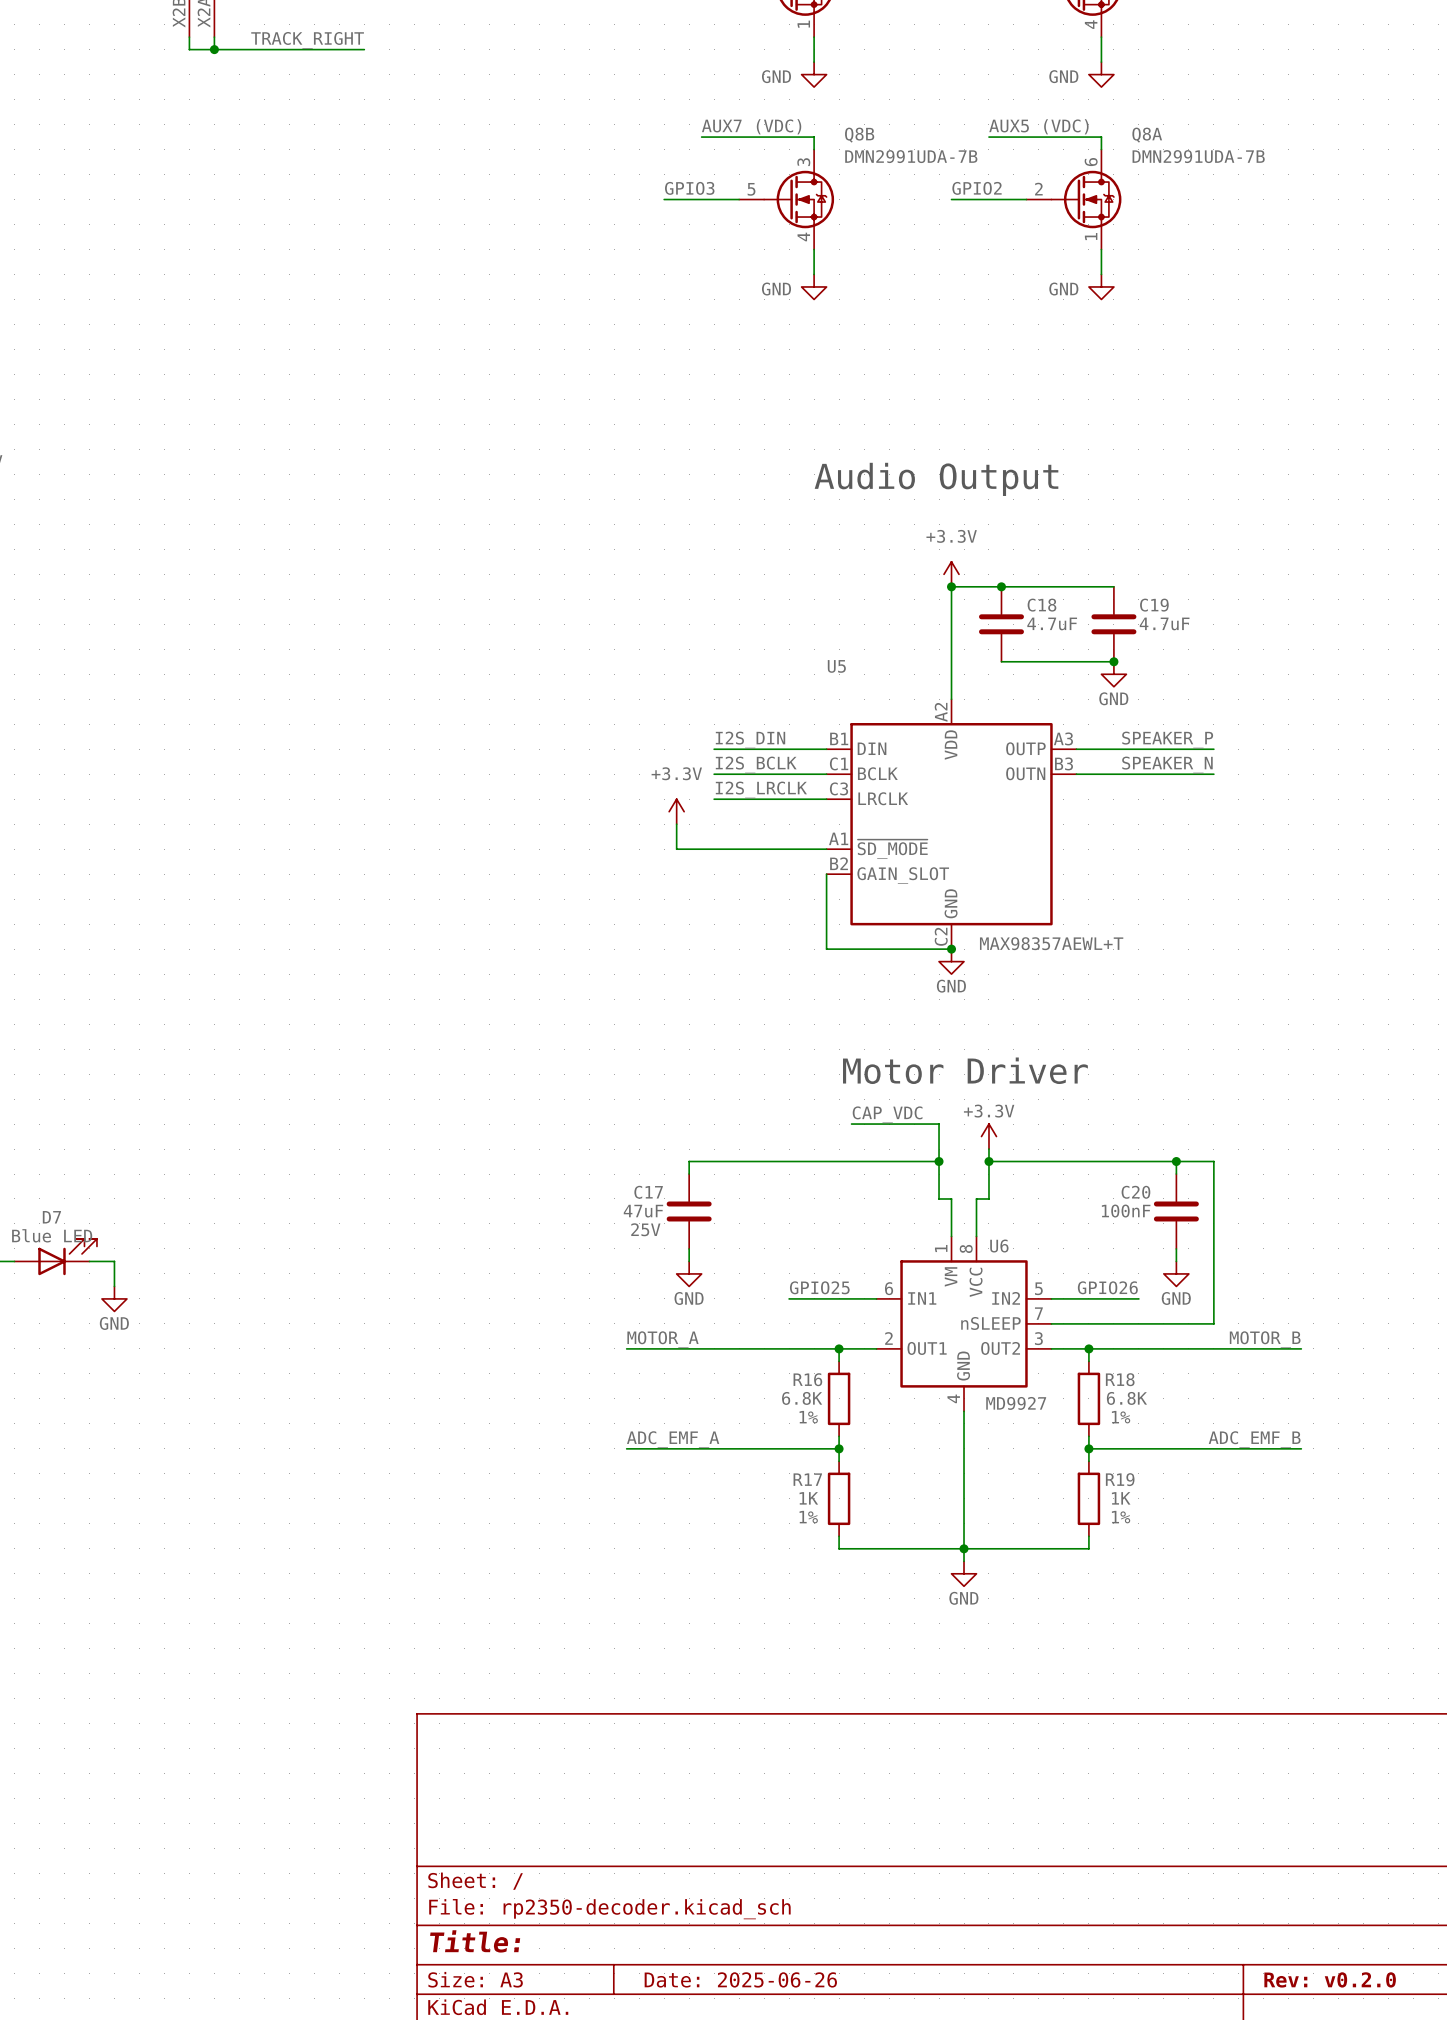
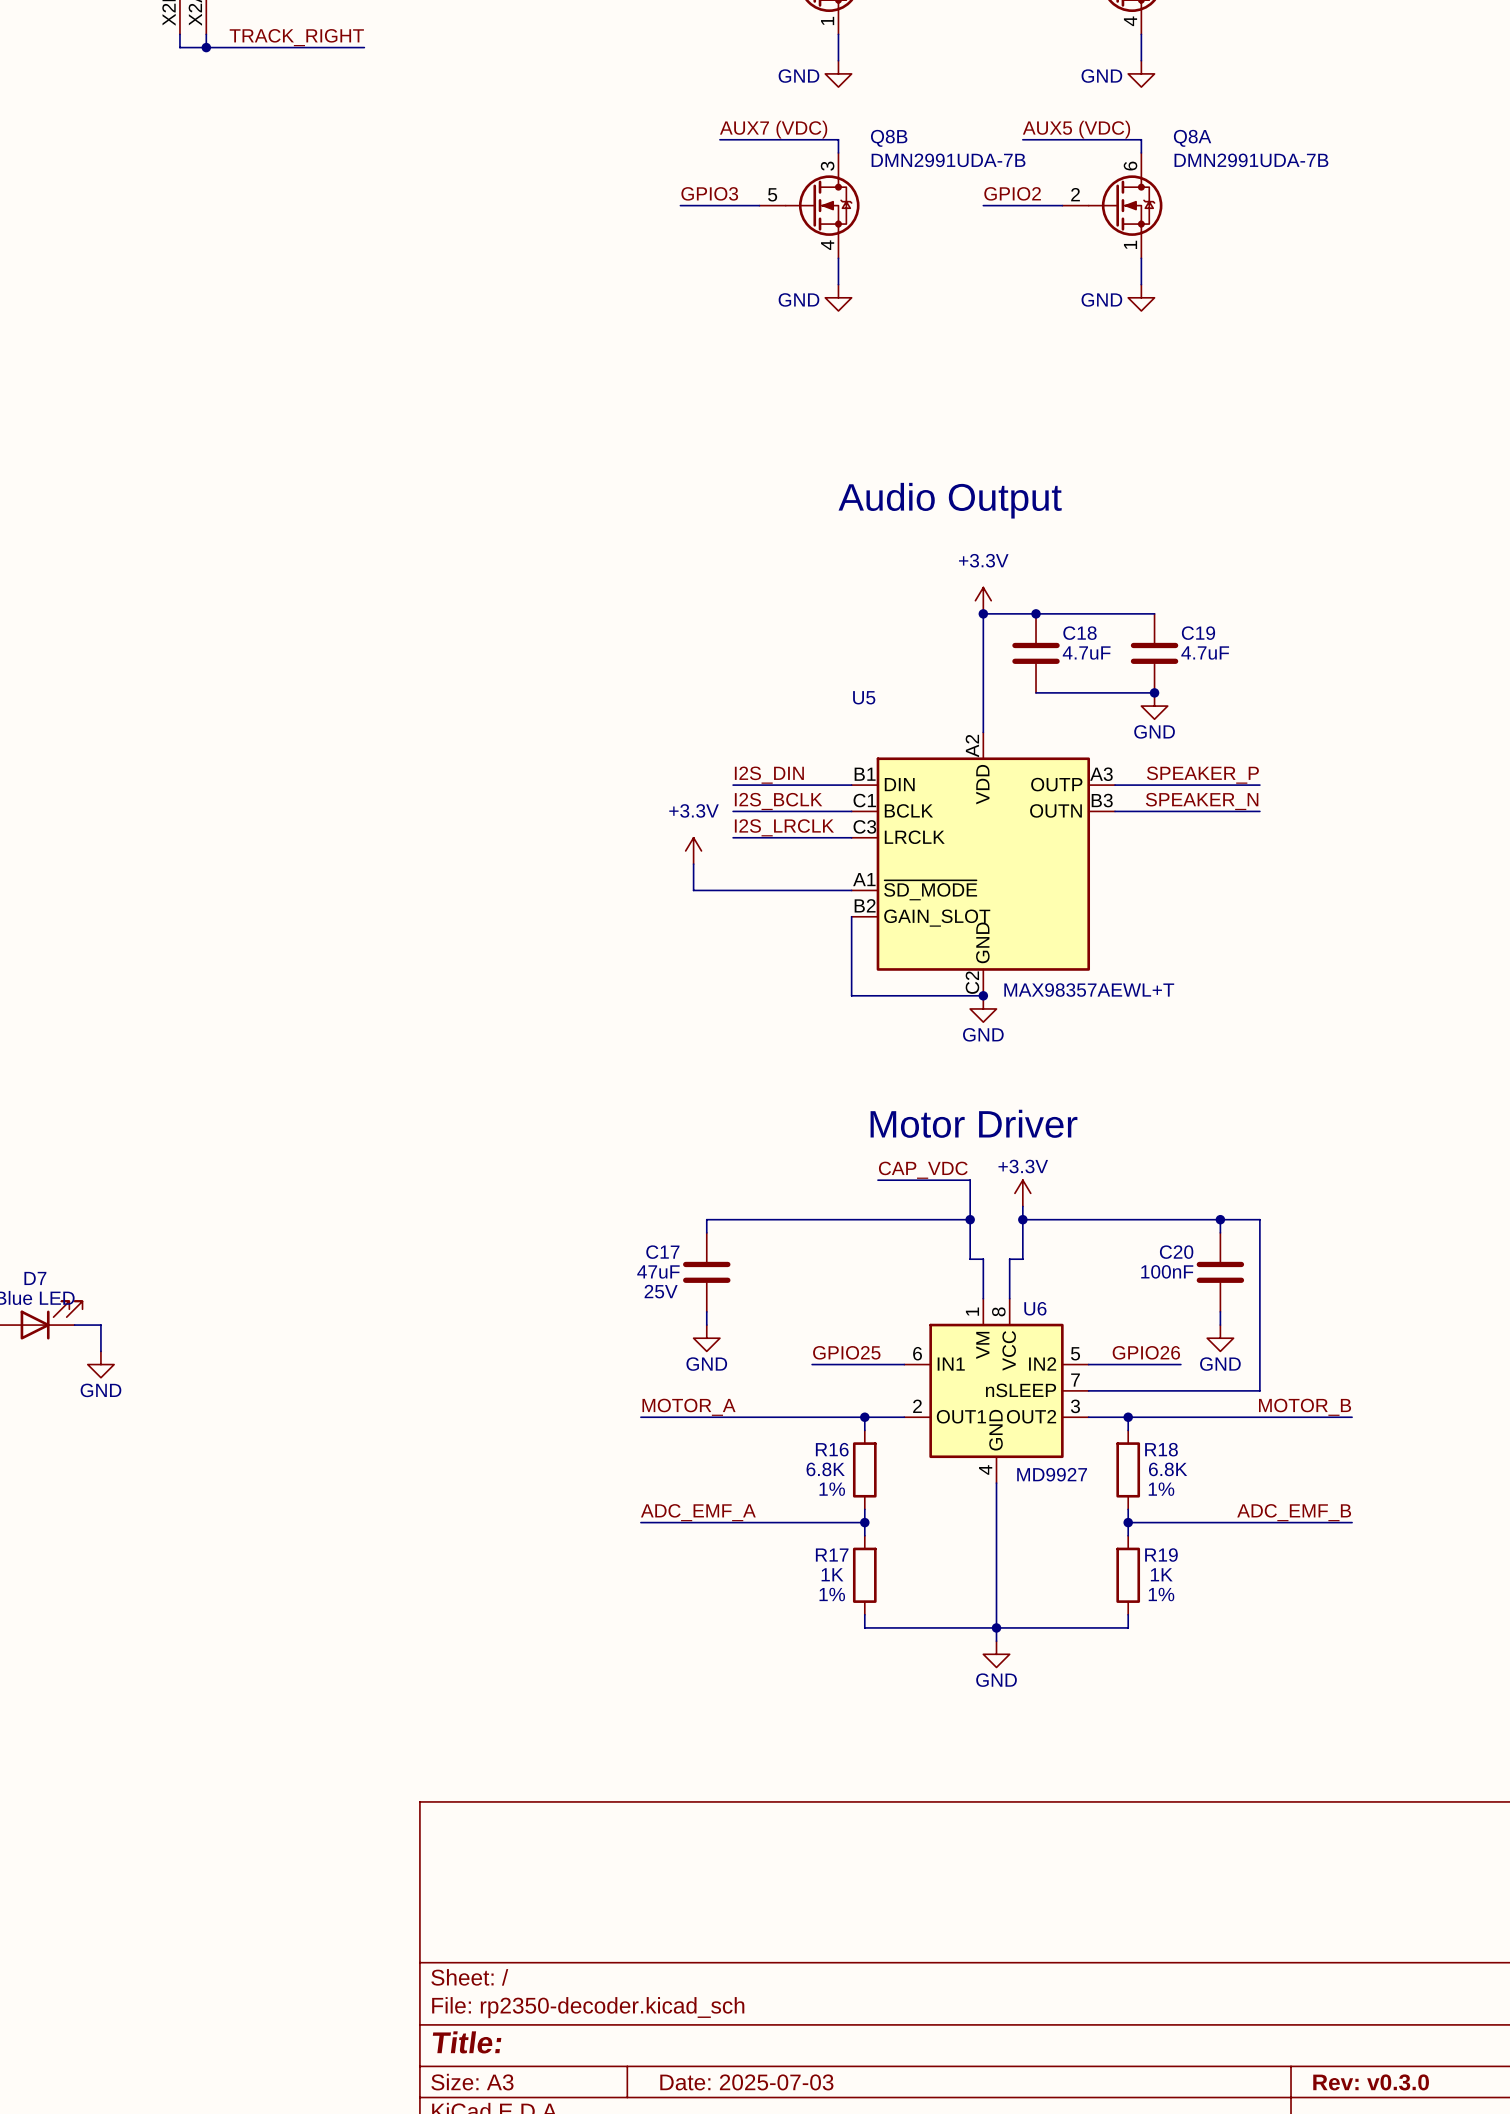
title block: Date: 2025-06-26 (740, 1979) -> Date: 2025-07-03 (746, 2082)
title block: Rev: v0.2.0 (1330, 1979) -> Rev: v0.3.0 (1371, 2082)

